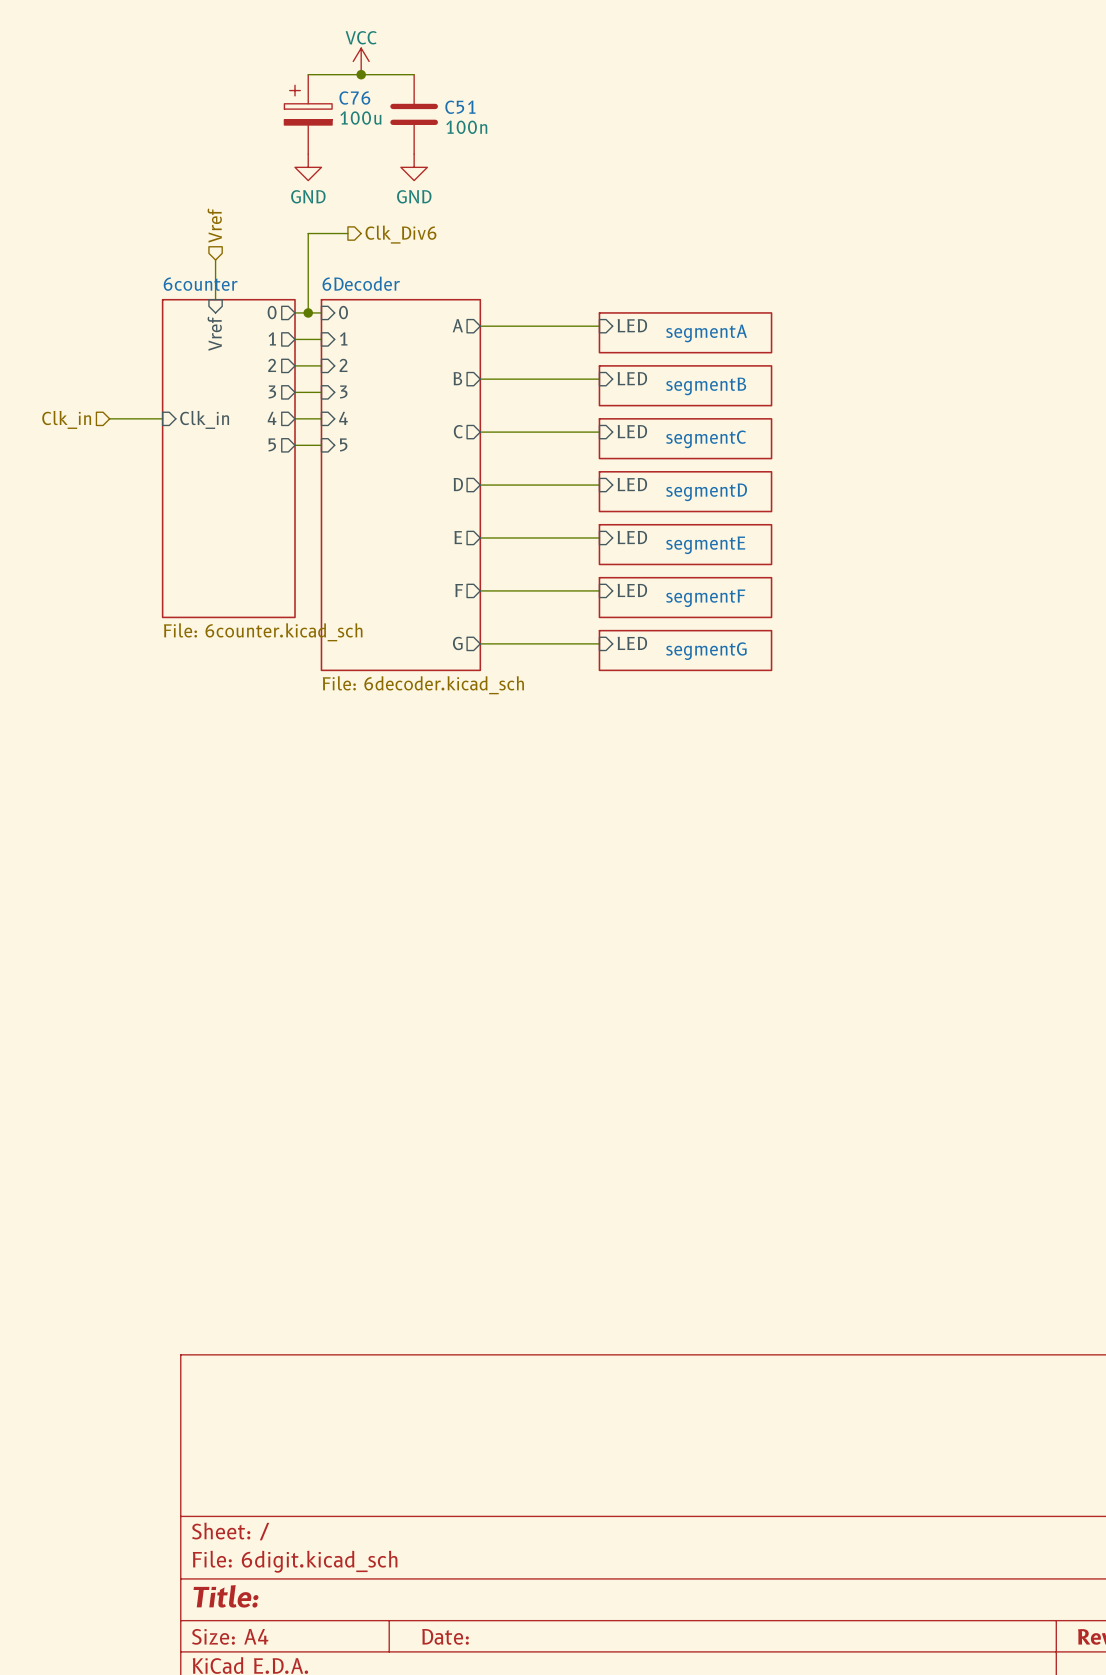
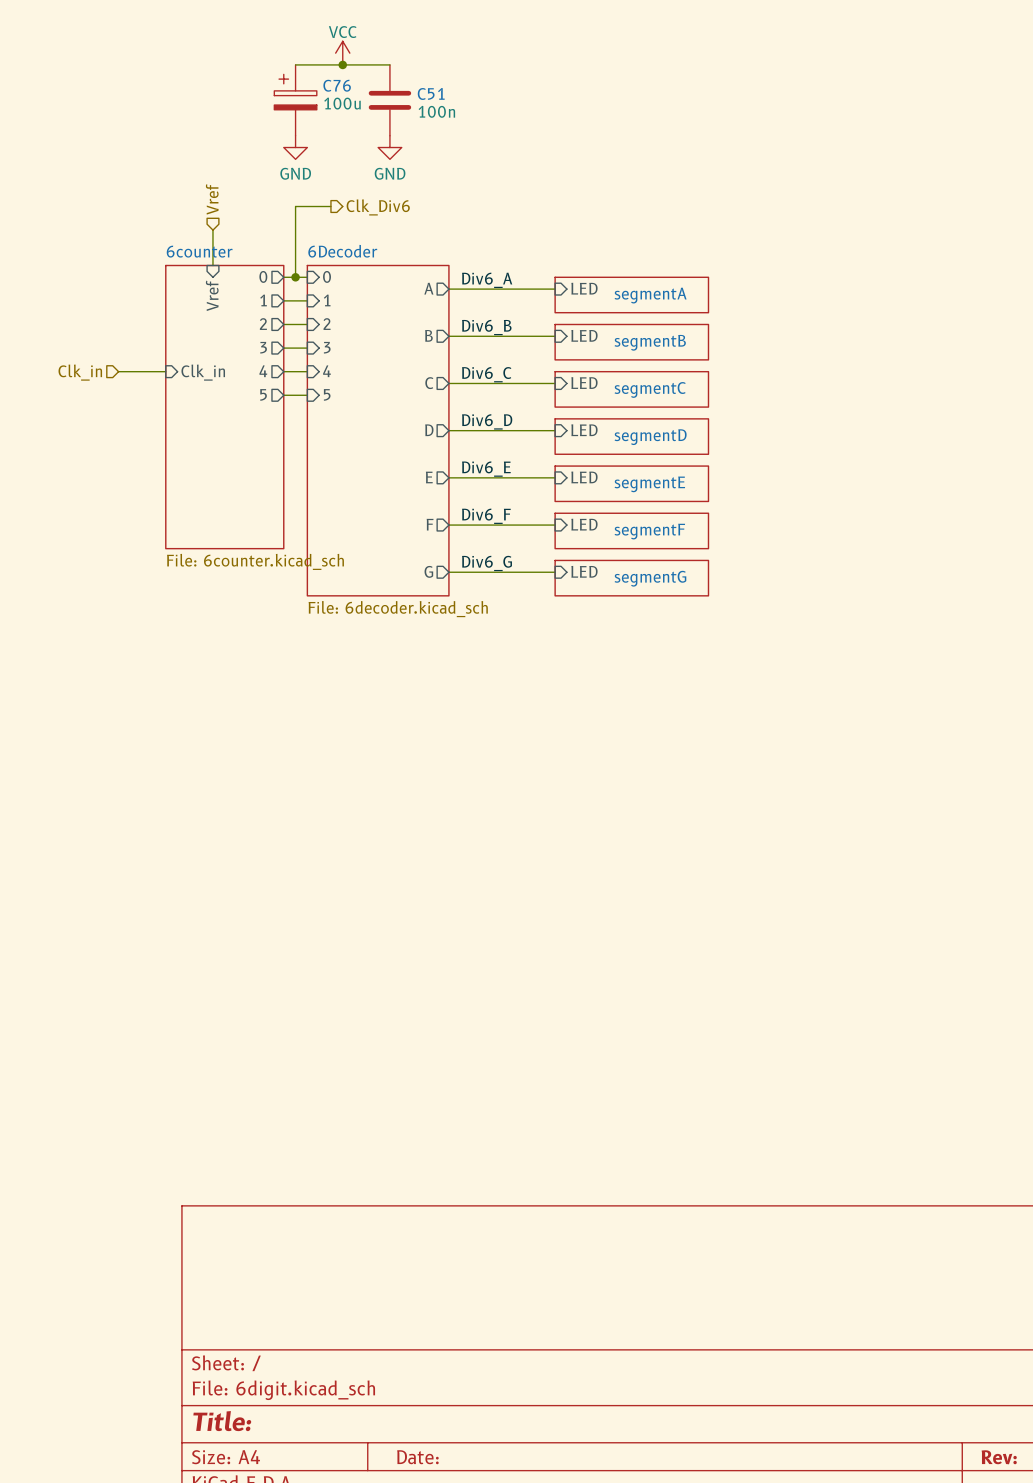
label: none -> Div6_A (487, 280)
label: none -> Div6_B (486, 327)
label: none -> Div6_C (486, 374)
label: none -> Div6_D (487, 421)
label: none -> Div6_E (486, 469)
label: none -> Div6_F (486, 516)
label: none -> Div6_G (487, 563)

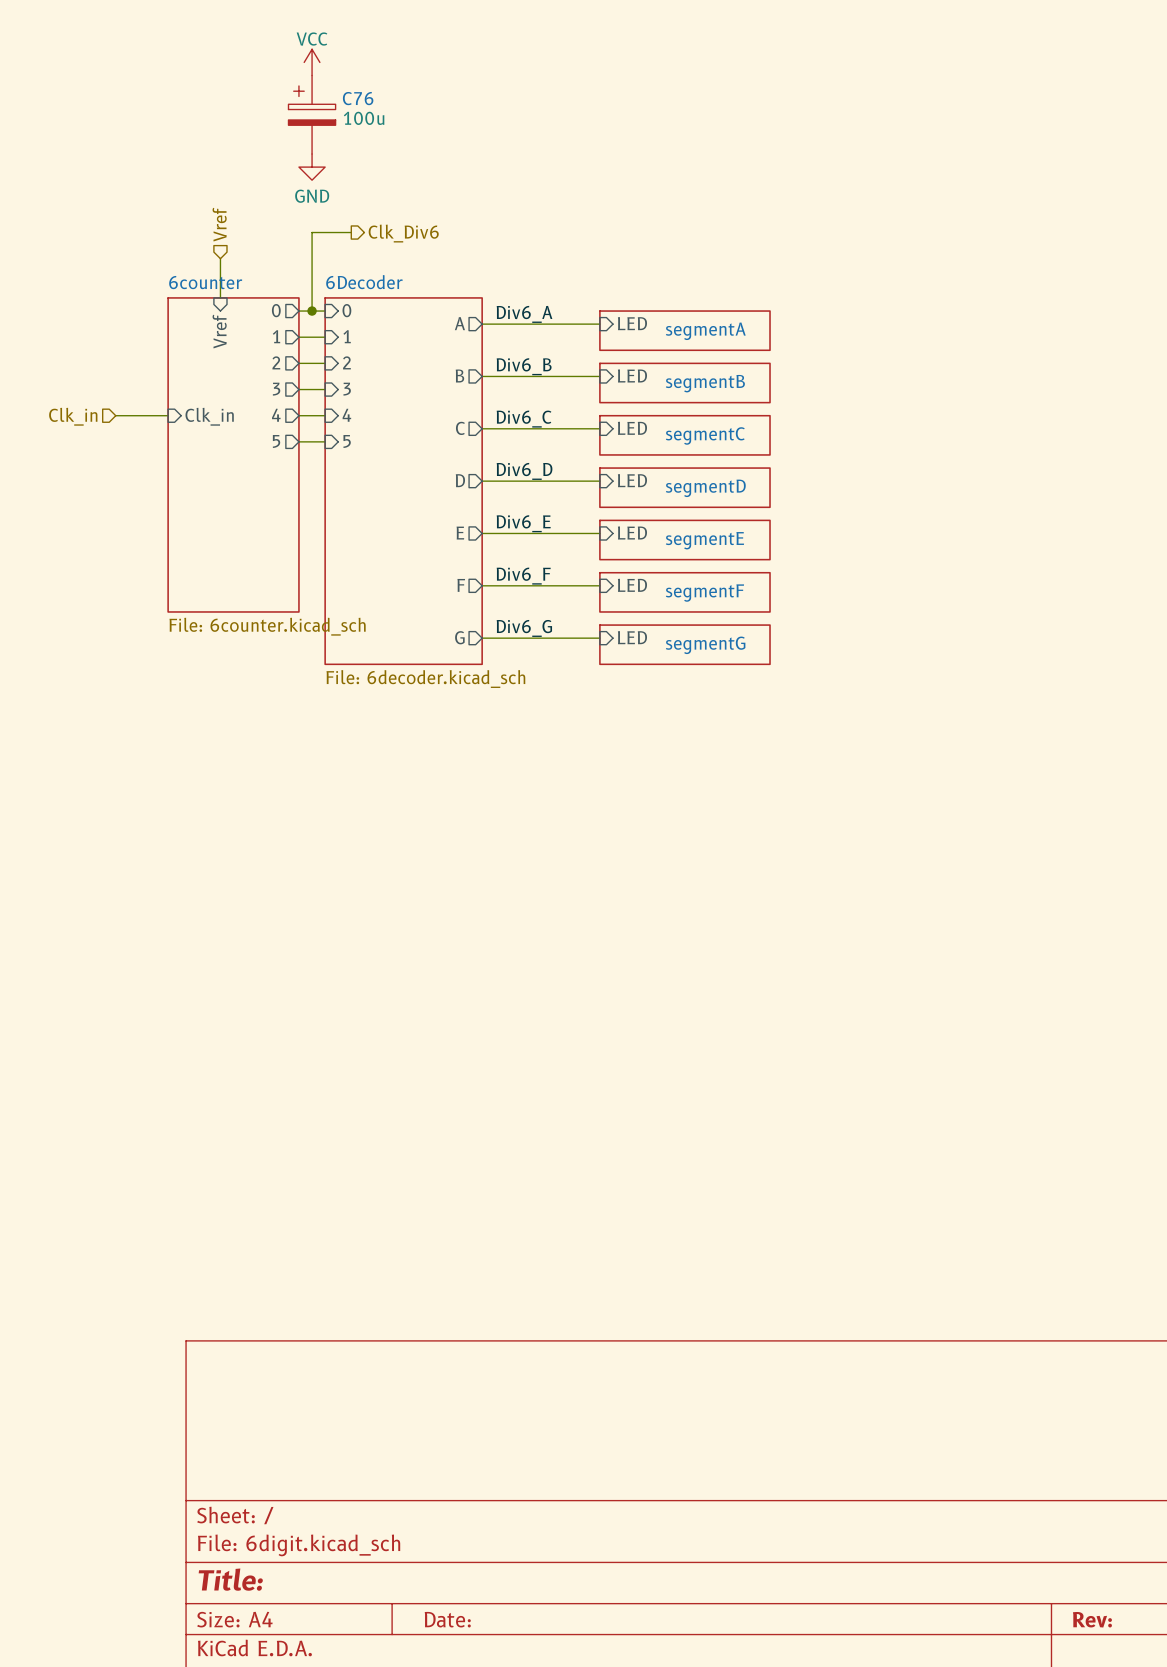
power symbol position: VCC (342, 53) -> VCC (312, 62)
wire: (295, 64) (389, 64) -> none
junction: (342, 64) -> none
C51: 100n (389, 100) -> none
power symbol: GND (389, 147) -> none

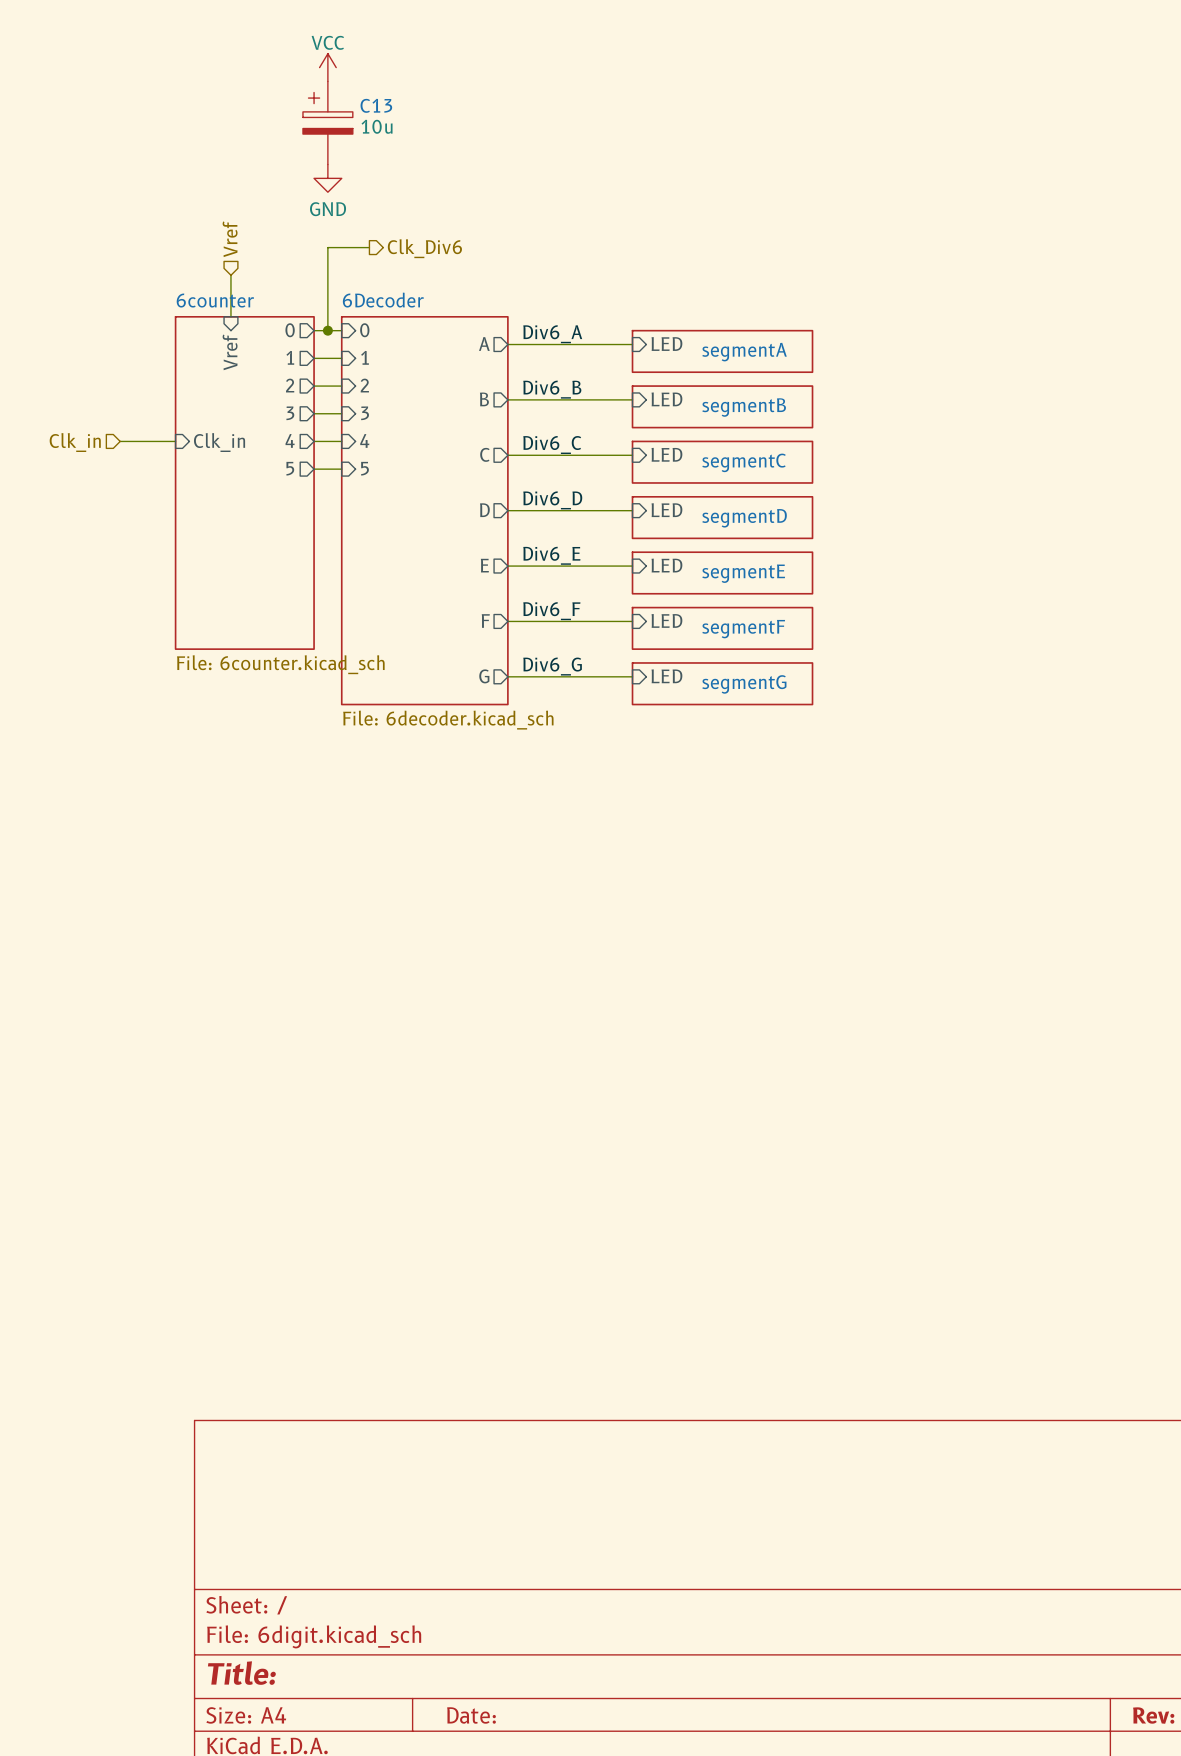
C76 name: C76 (358, 98) -> C13 (376, 105)
C76 value: 100u (364, 118) -> 10u (377, 126)

